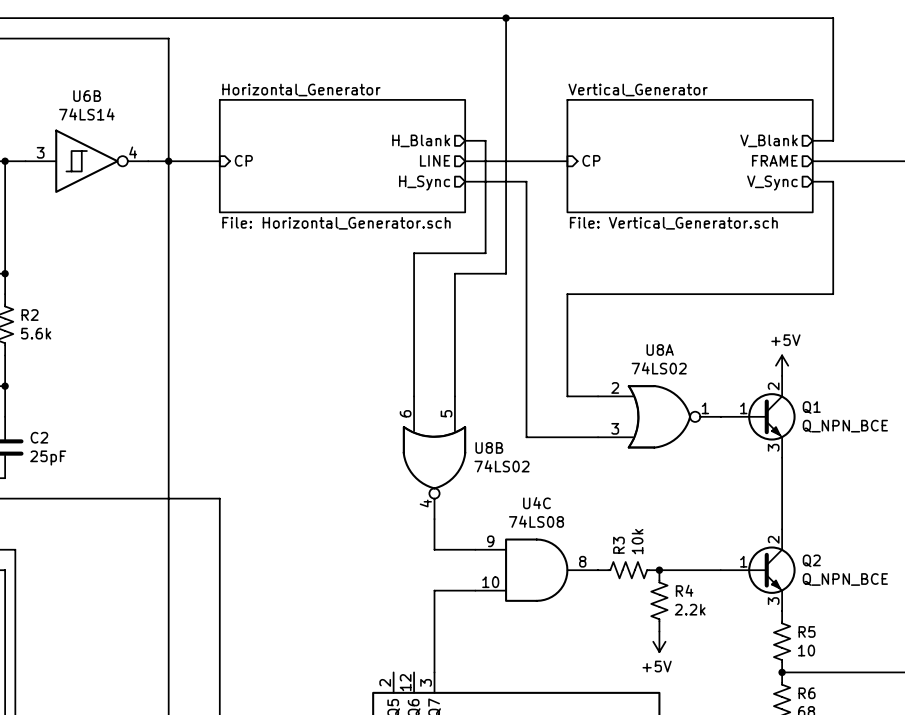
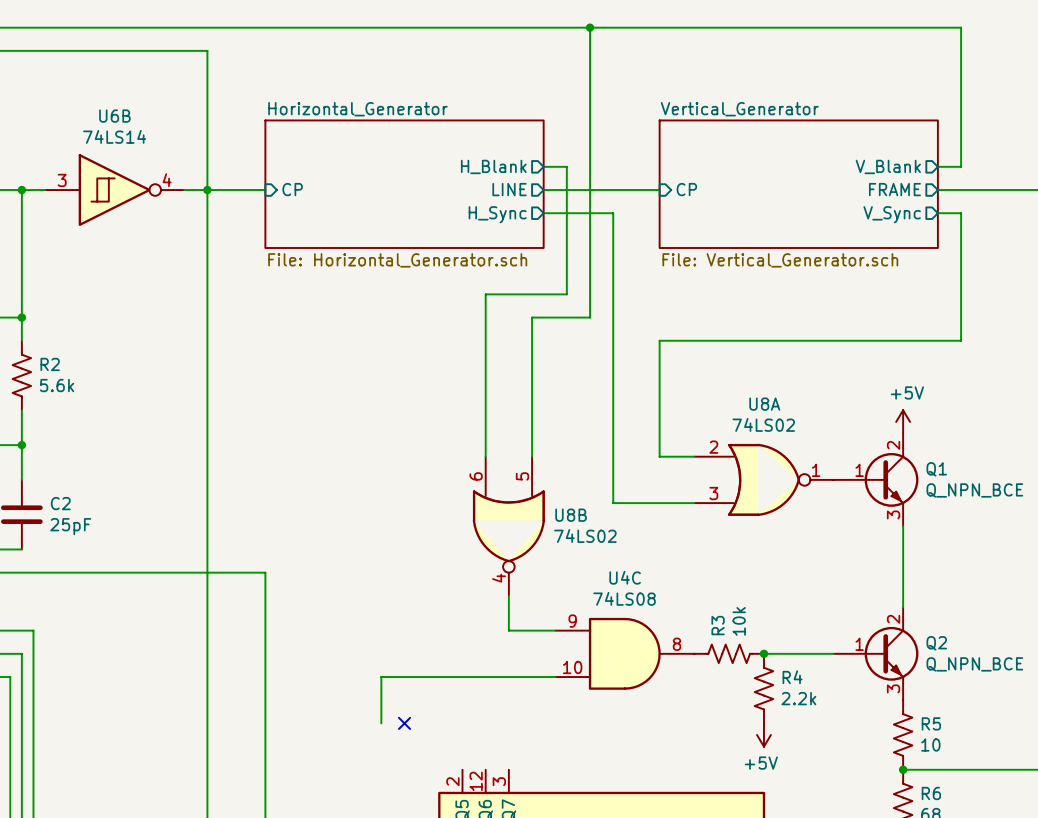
wire: (434, 590) (434, 672) -> (508, 677) (381, 677) (381, 723)
no-connect mark: none -> (404, 723)

